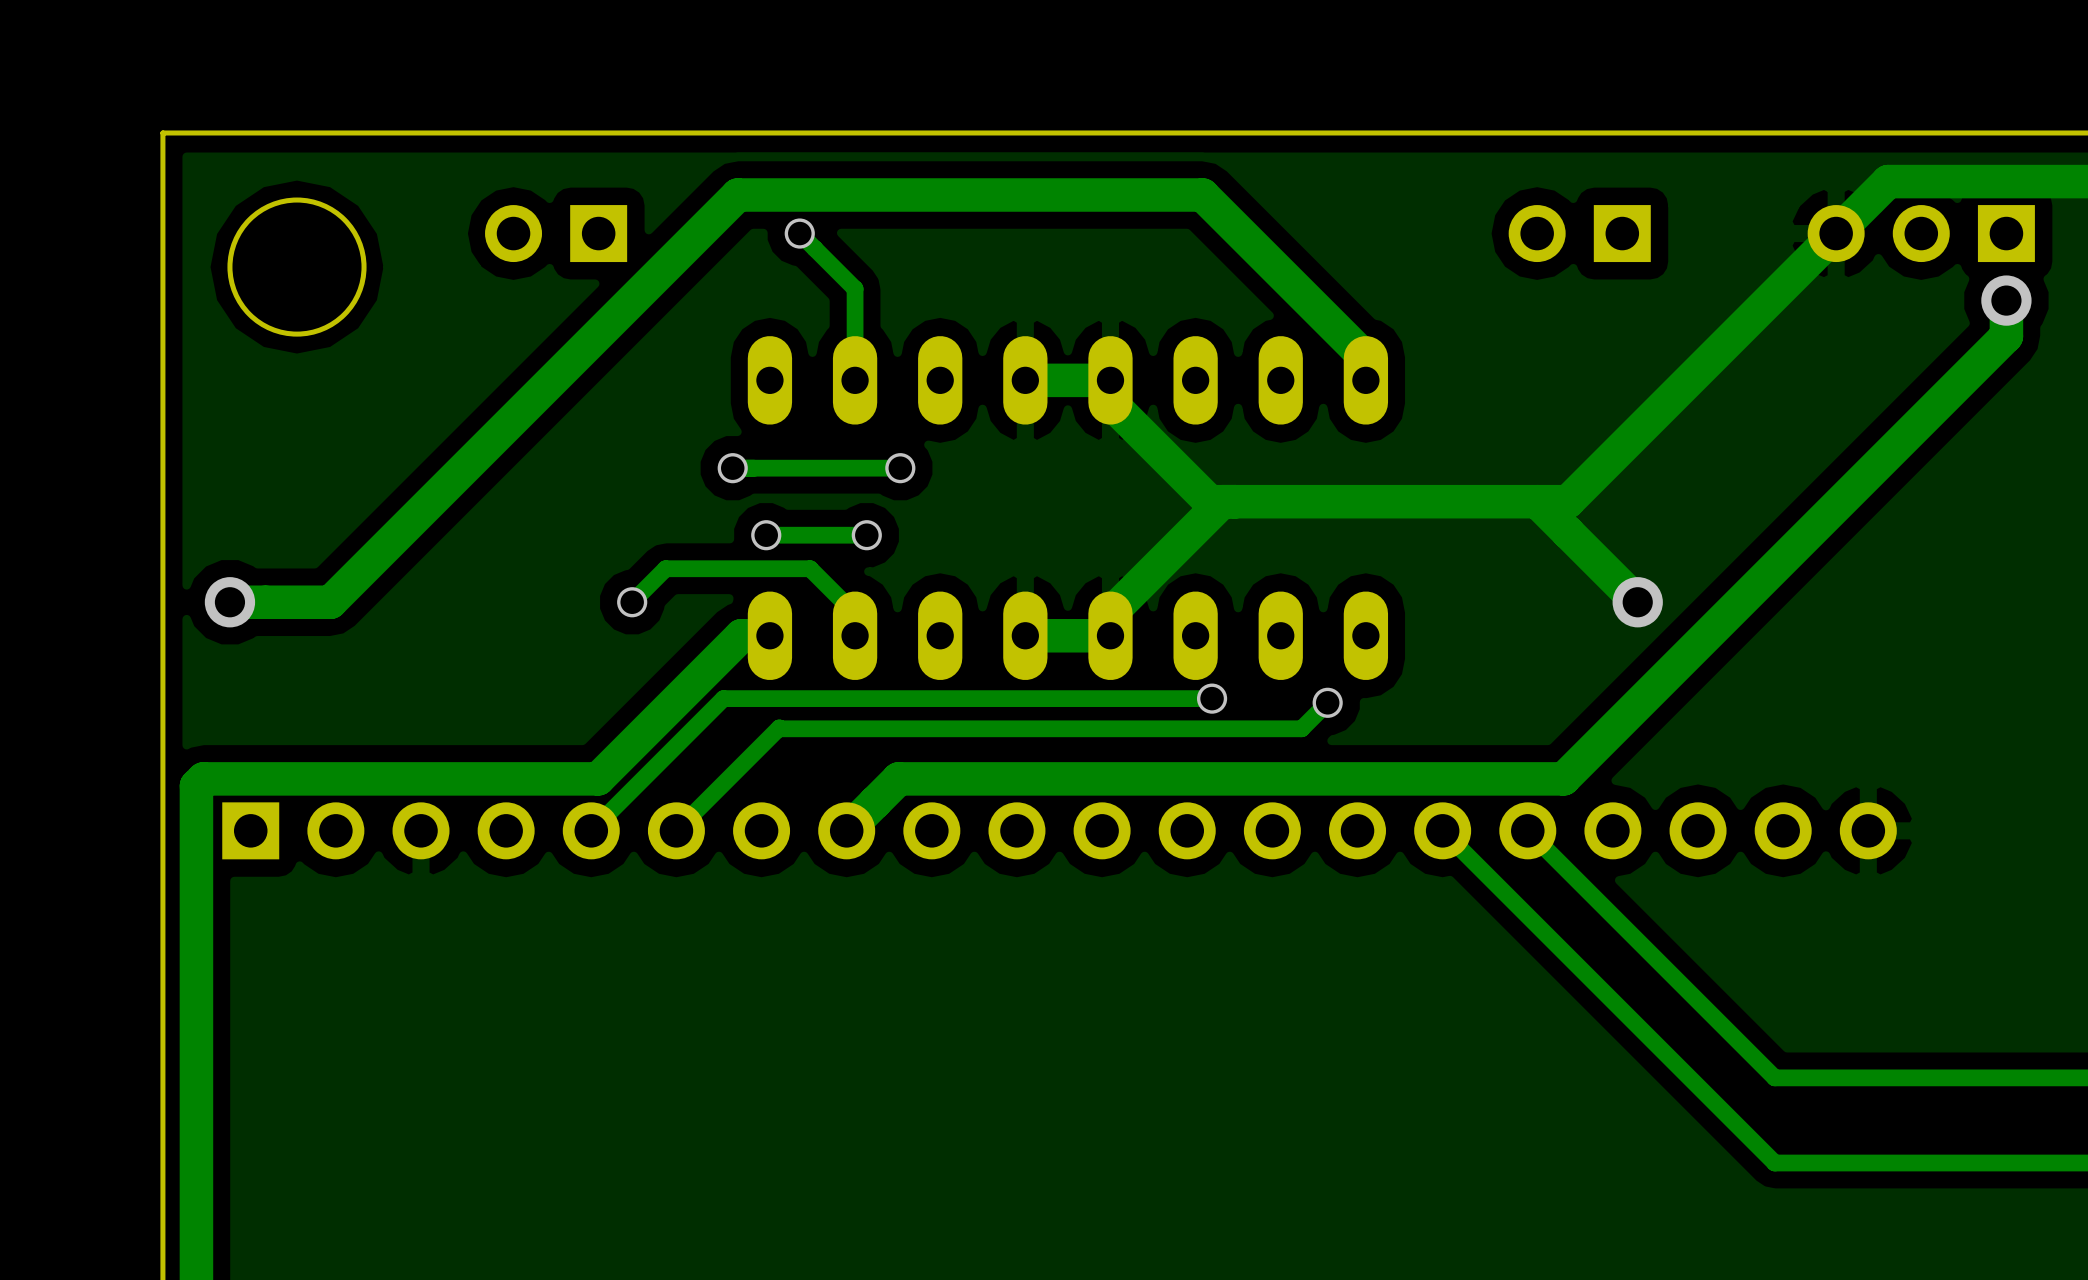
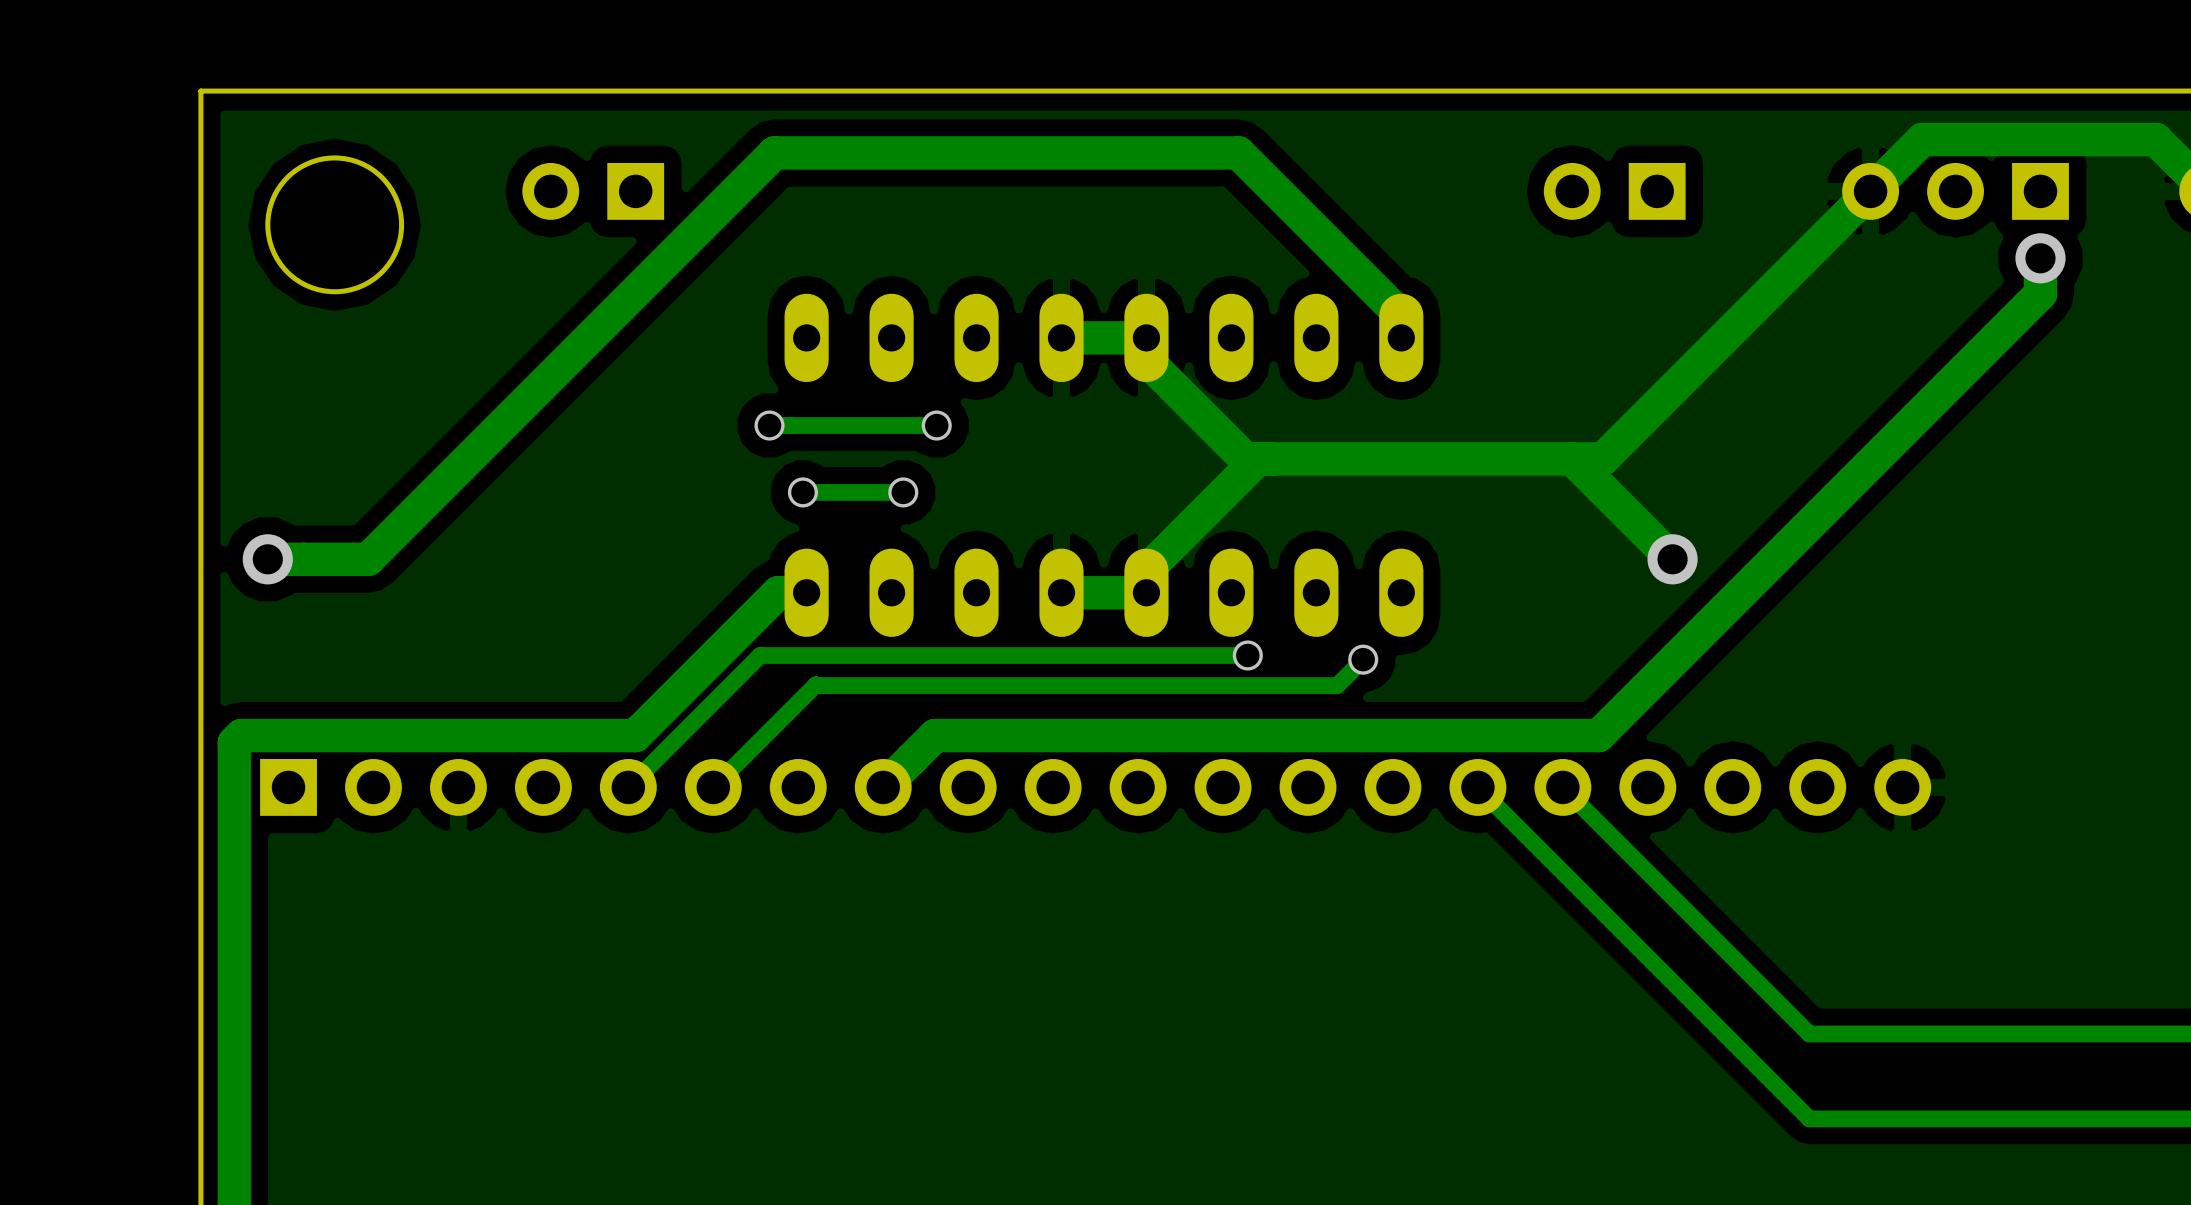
track: (799, 233) (855, 288) (855, 380) -> none
via: (799, 233) -> none
track: (632, 602) (665, 568) (810, 568) (855, 613) -> none
via: (632, 602) -> none

